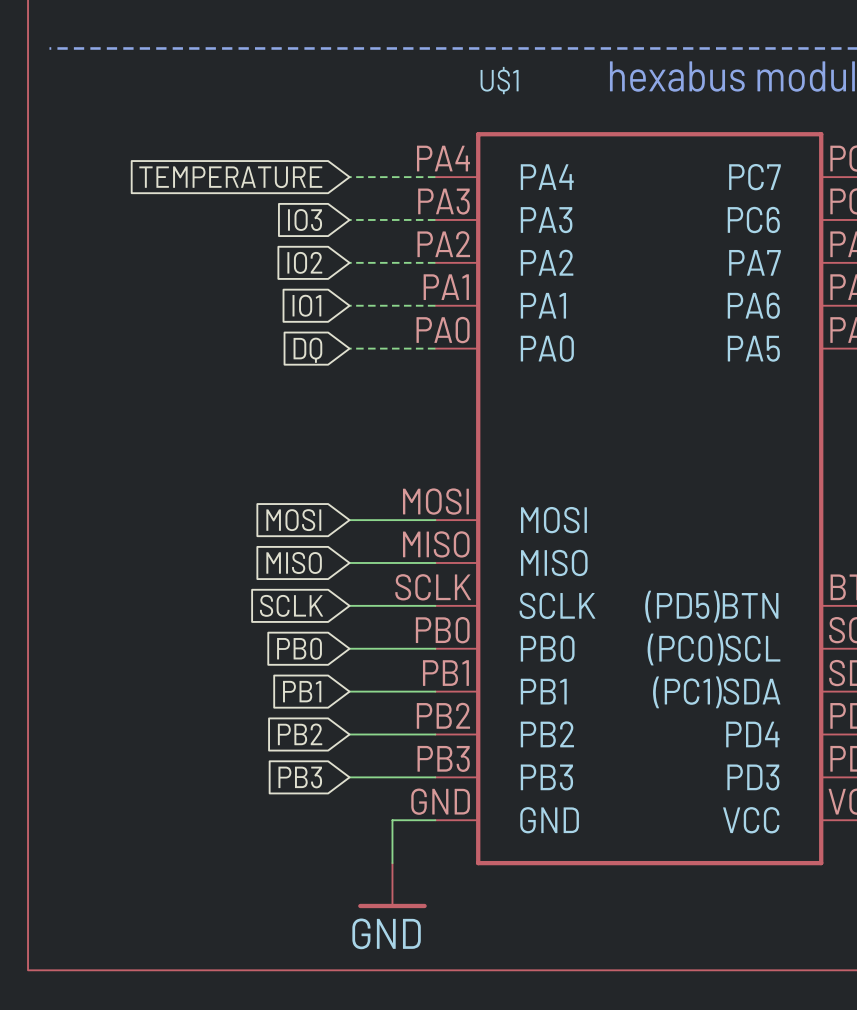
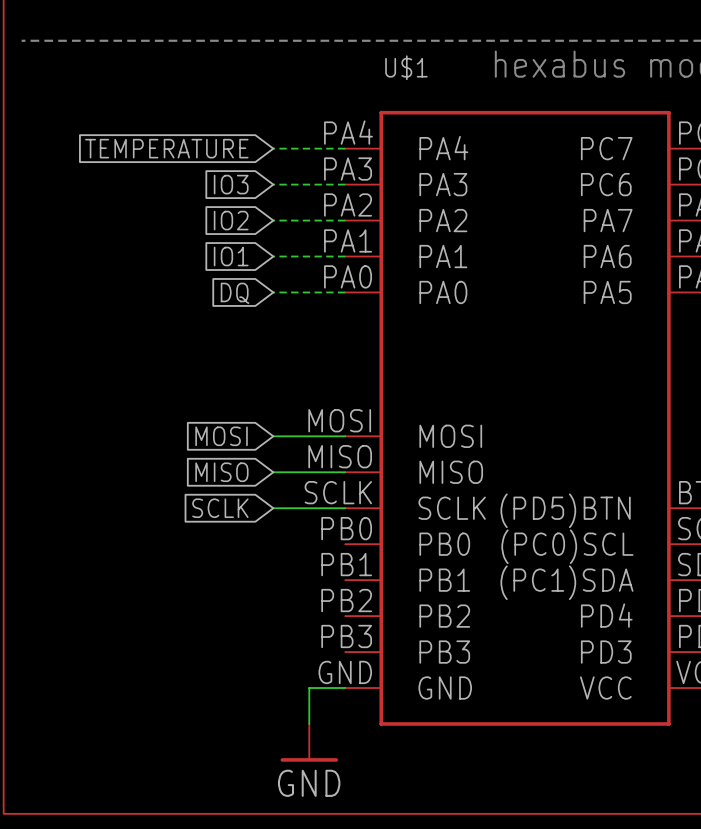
global label: PB0 (299, 648) -> none
wire: (349, 648) (435, 648) -> none
global label: PB1 (302, 691) -> none
wire: (349, 691) (435, 691) -> none
global label: PB2 (300, 734) -> none
wire: (349, 734) (435, 734) -> none
global label: PB3 (300, 777) -> none
wire: (349, 777) (435, 777) -> none

